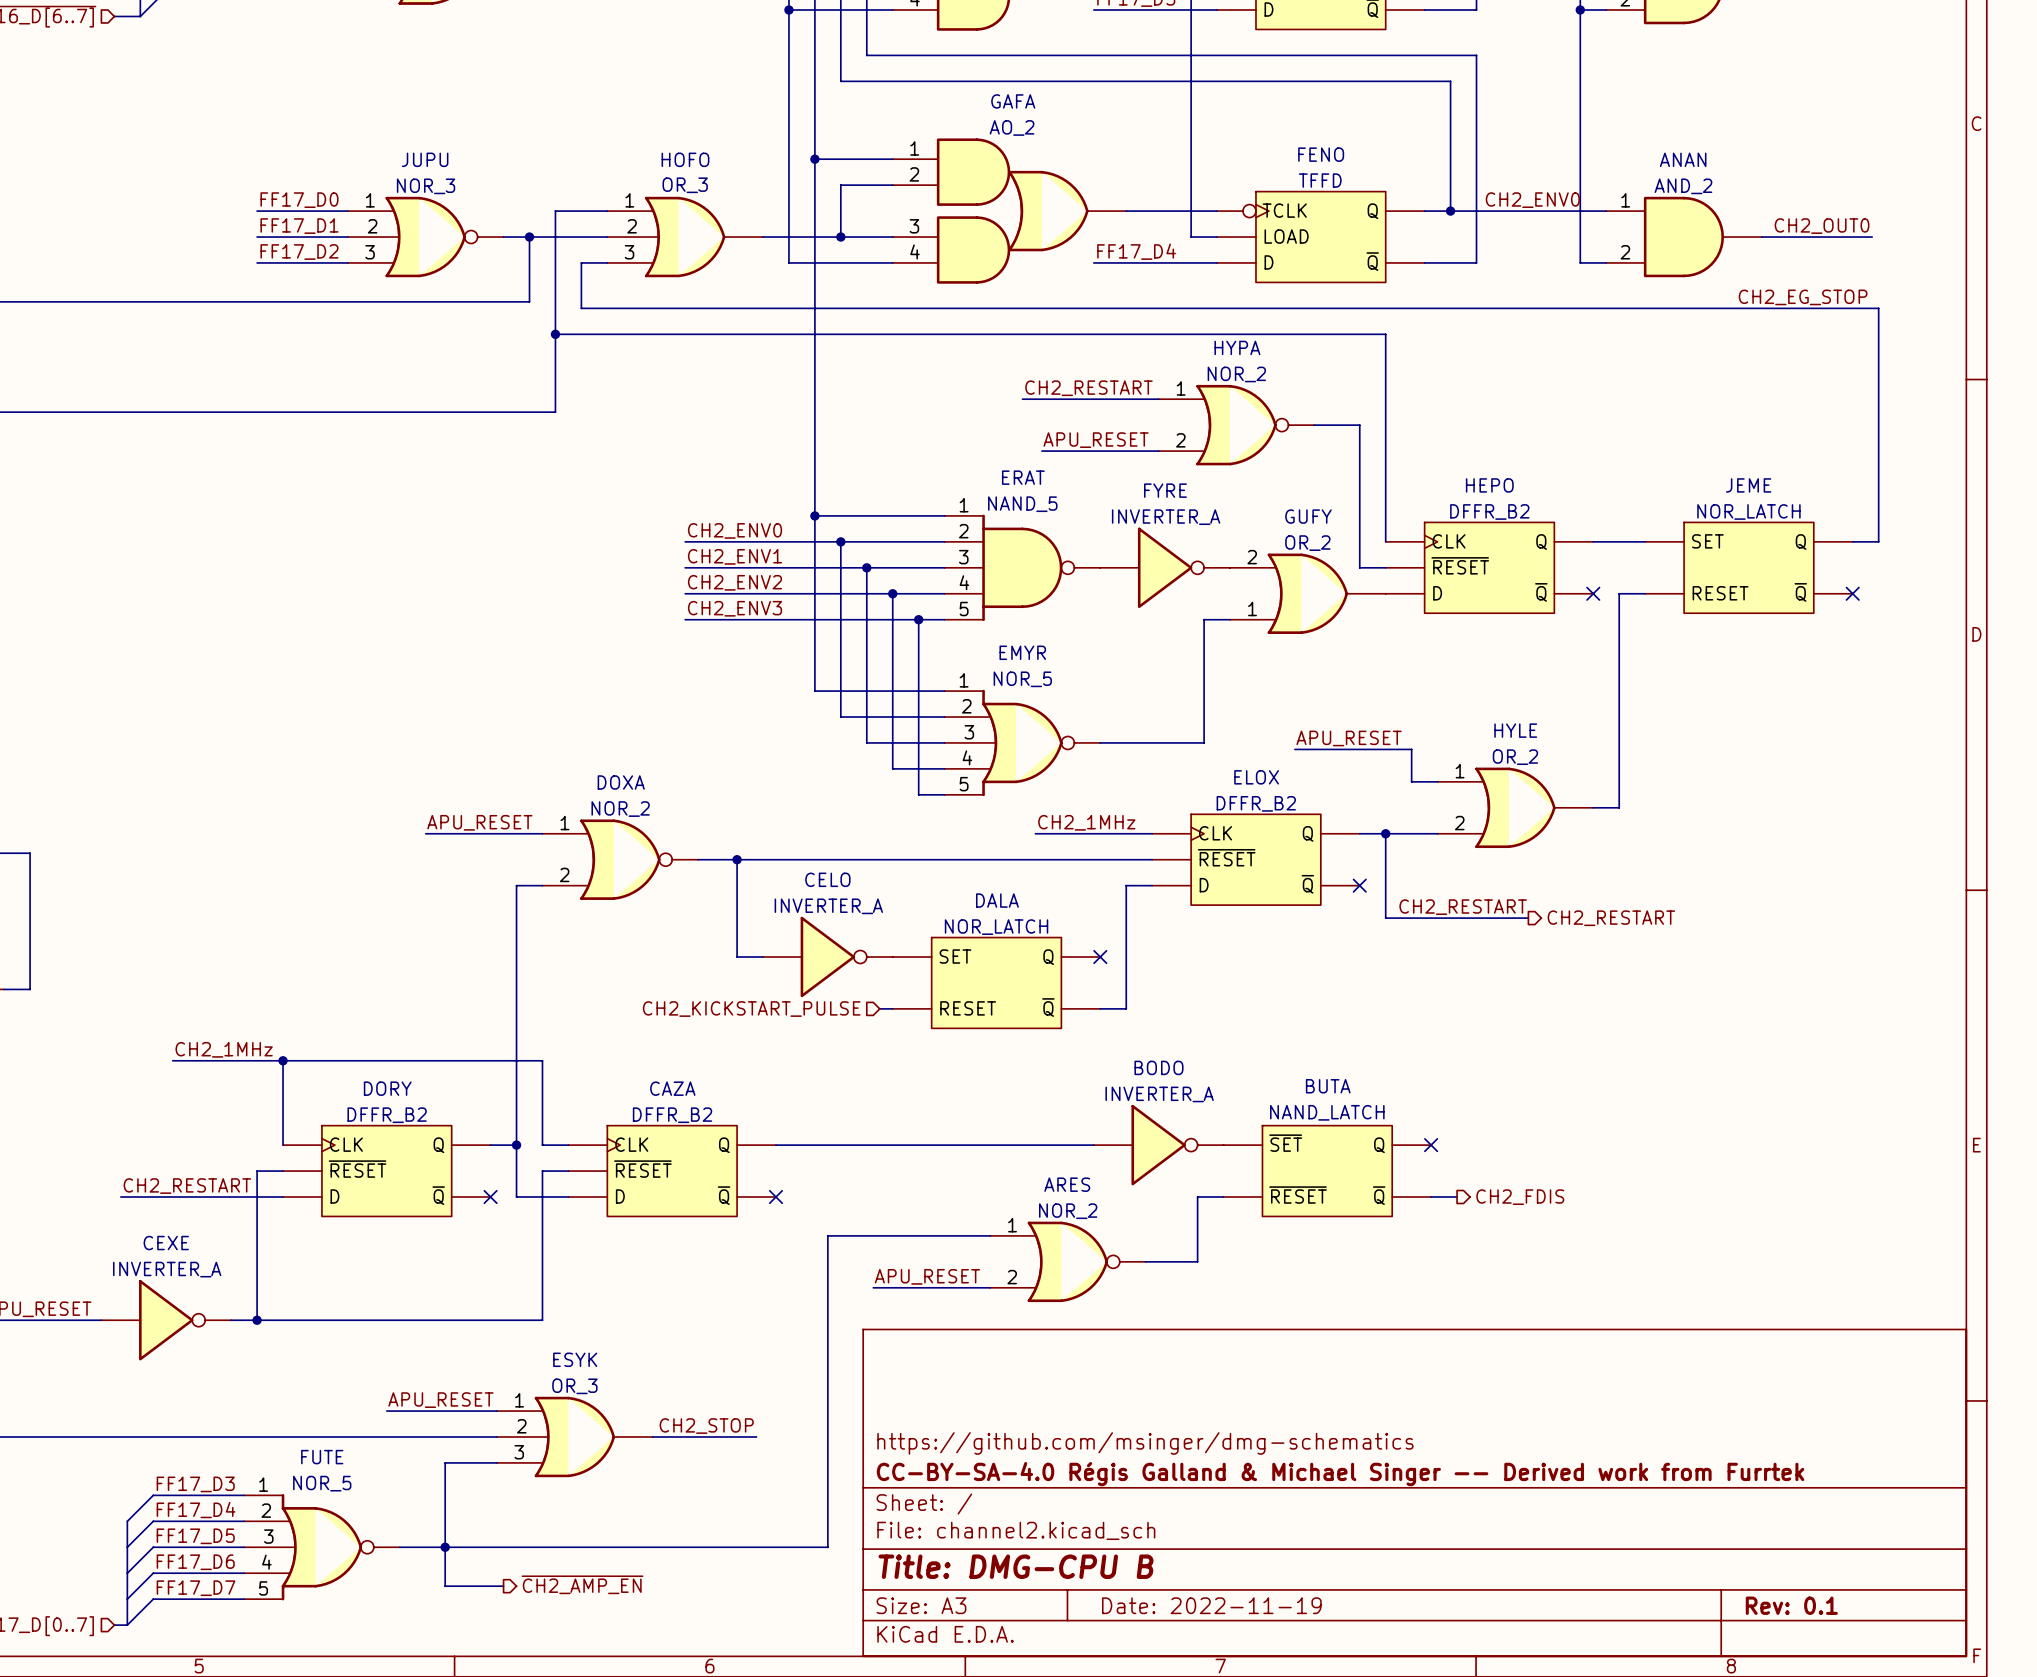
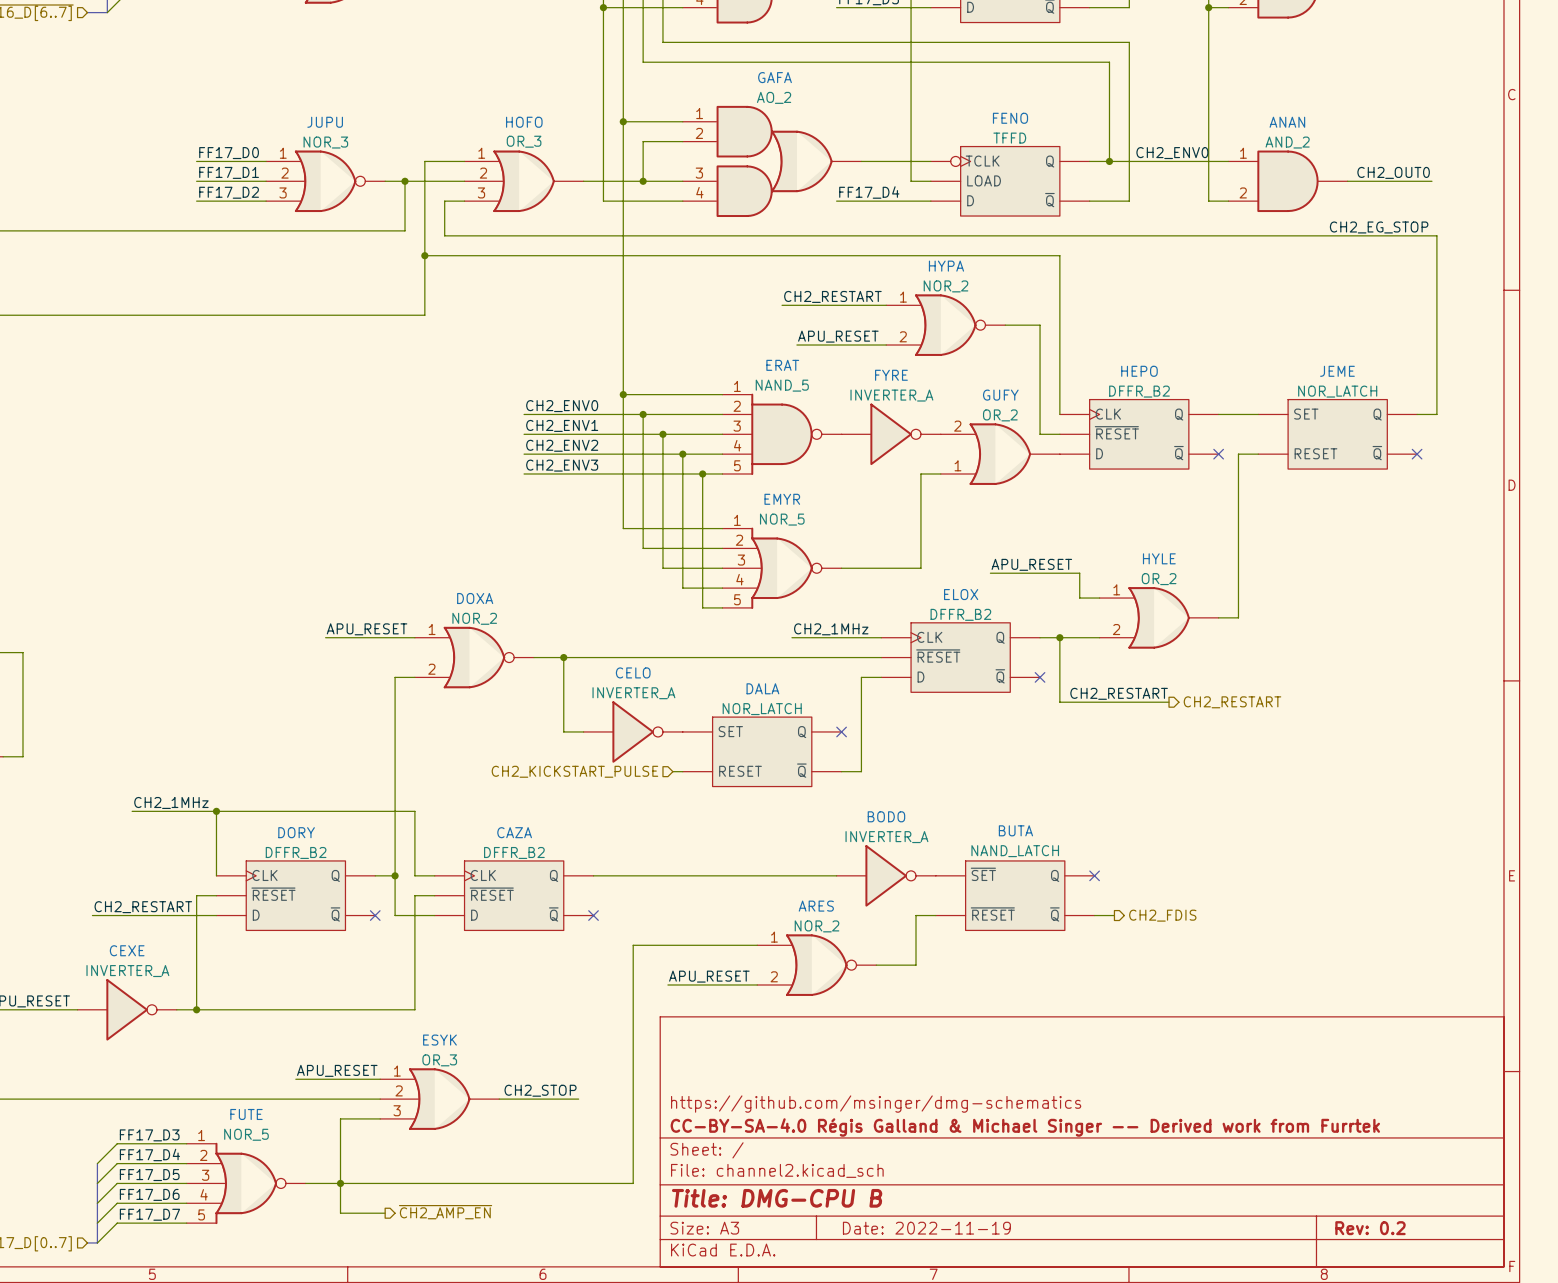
title block: Rev: 0.1 (1791, 1605) -> Rev: 0.2 (1370, 1228)

